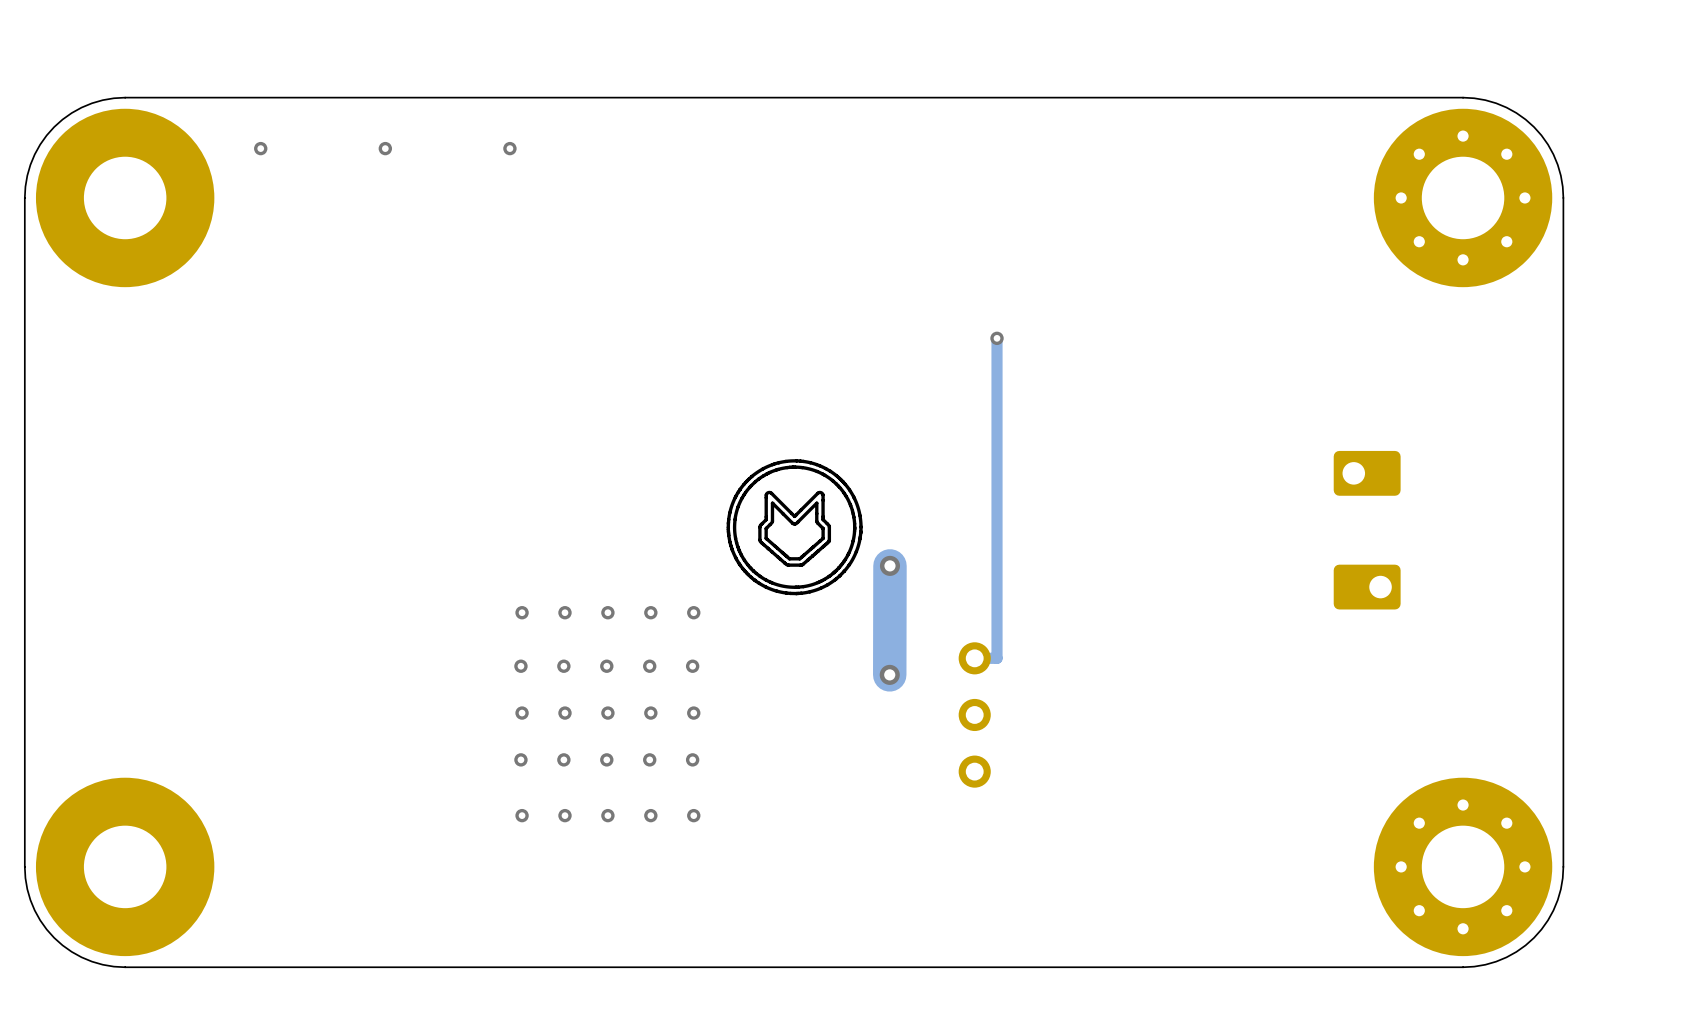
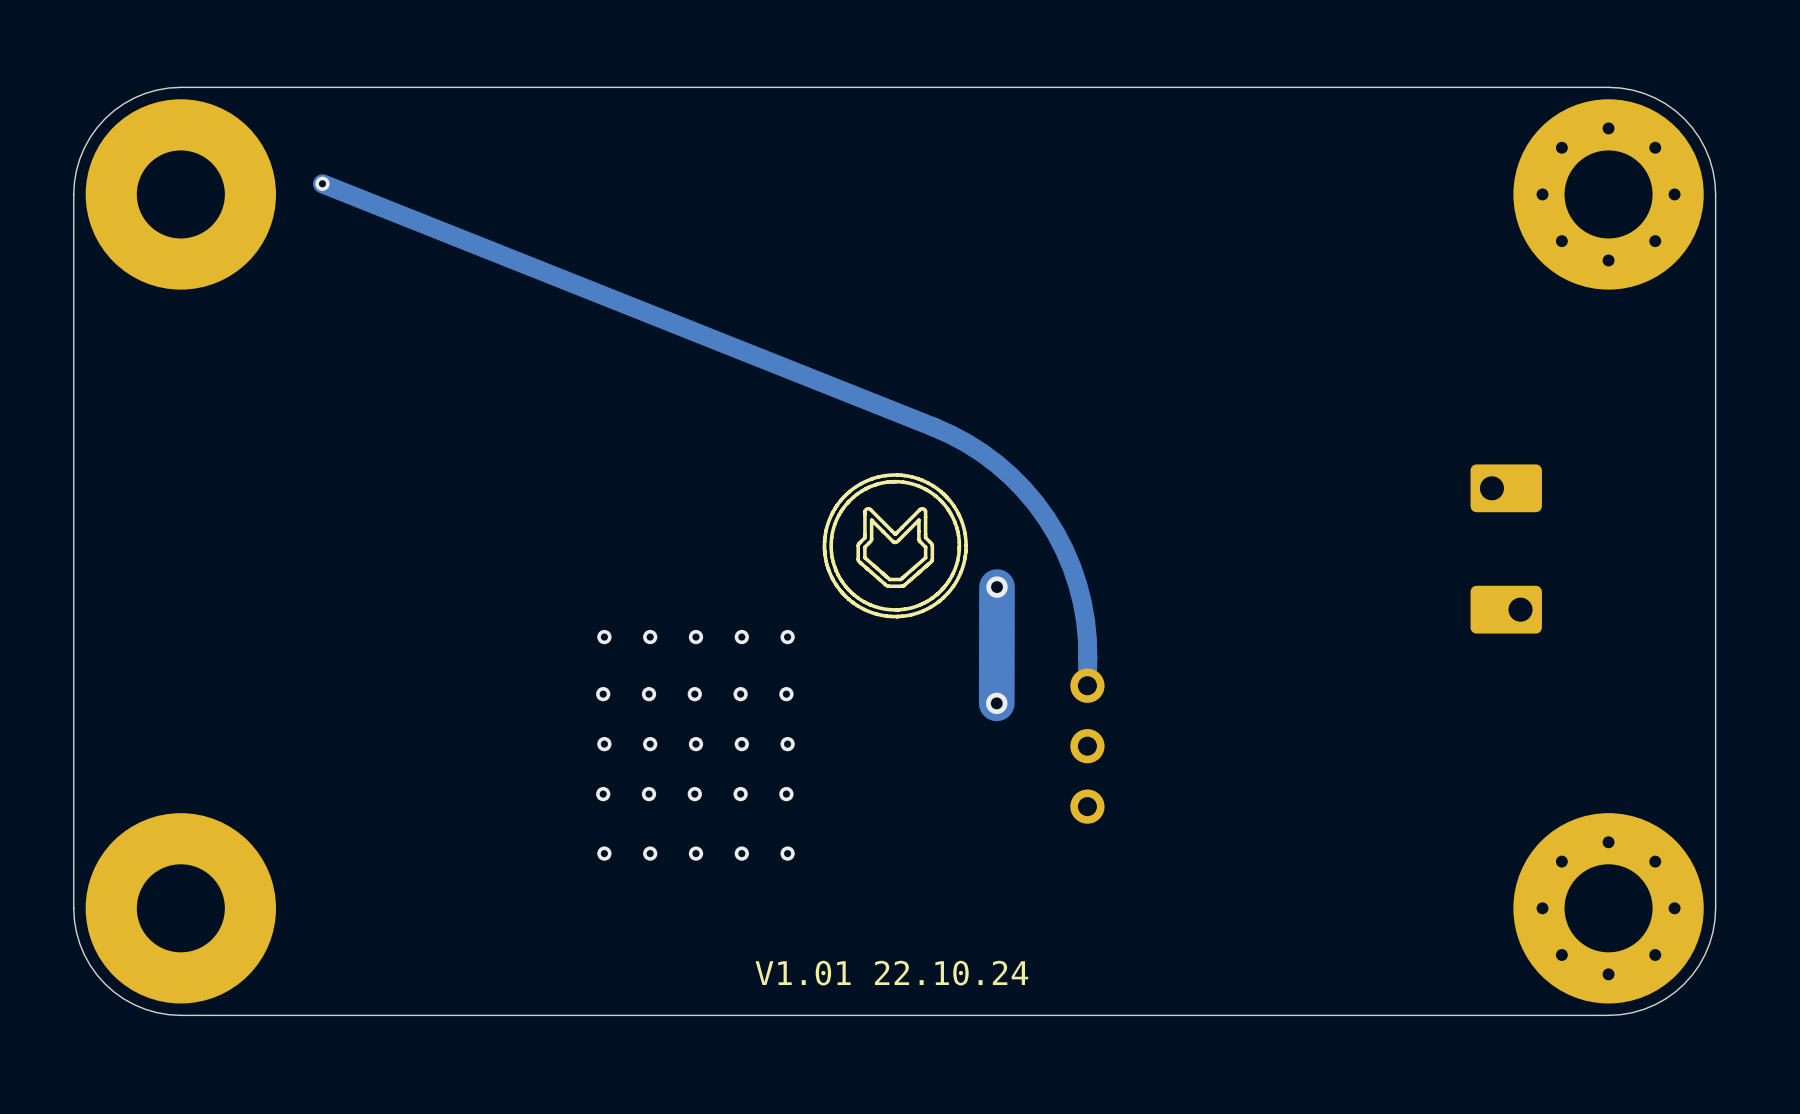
via position: (260, 148) -> (322, 183)
via: (385, 148) -> none
via: (509, 148) -> none
track: (997, 338) (997, 658) (974, 658) -> (322, 183) (933, 427) (982, 453) (1023, 489) (1046, 518) (1064, 550) (1077, 584) (1085, 620) (1087, 685)
via: (997, 338) -> none
text: none -> V1.01 22.10.24 (891, 973)

